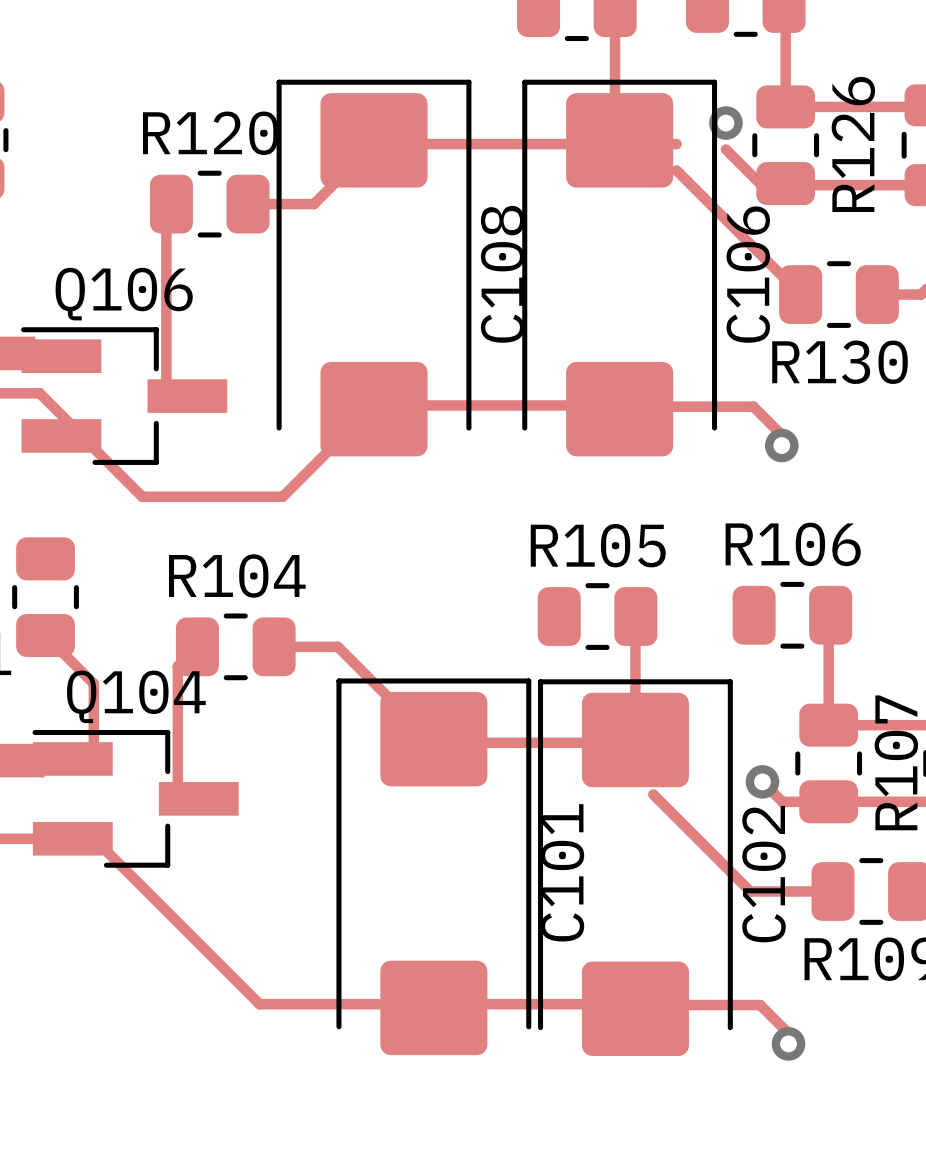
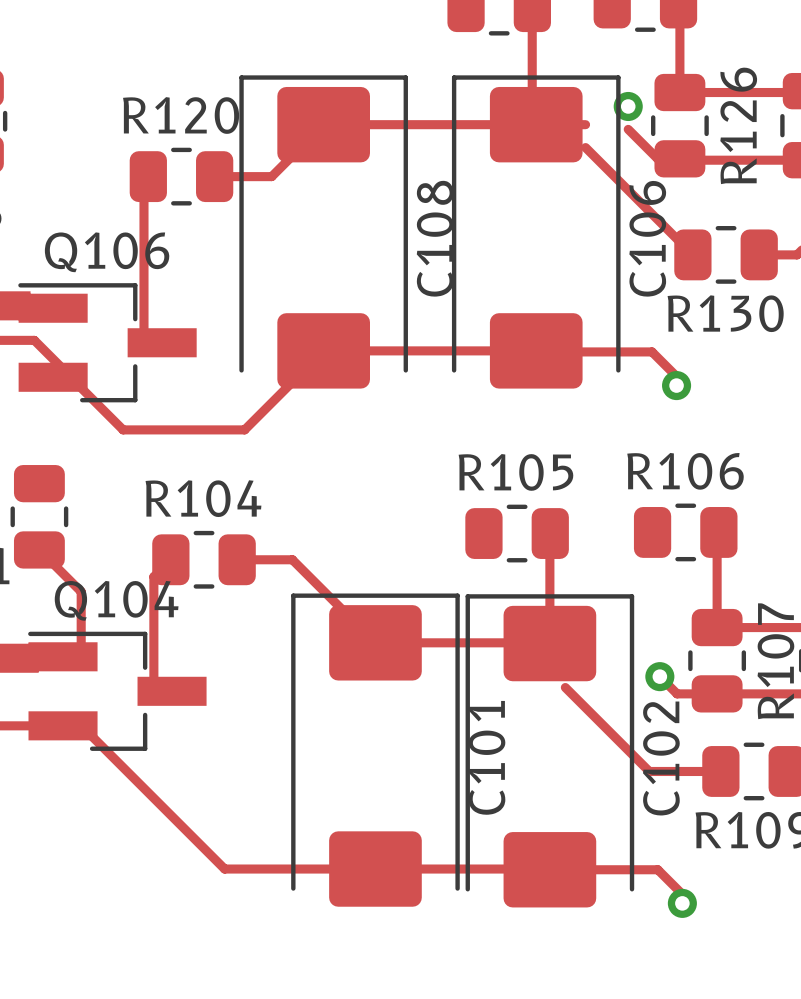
C108 footprint: [276, 79, 472, 457] -> [239, 75, 408, 389]
C106 footprint: [522, 79, 718, 457] -> [451, 75, 621, 389]
C101 footprint: [336, 678, 532, 1056] -> [291, 593, 460, 907]
C102 footprint: [538, 679, 733, 1056] -> [465, 594, 635, 908]

